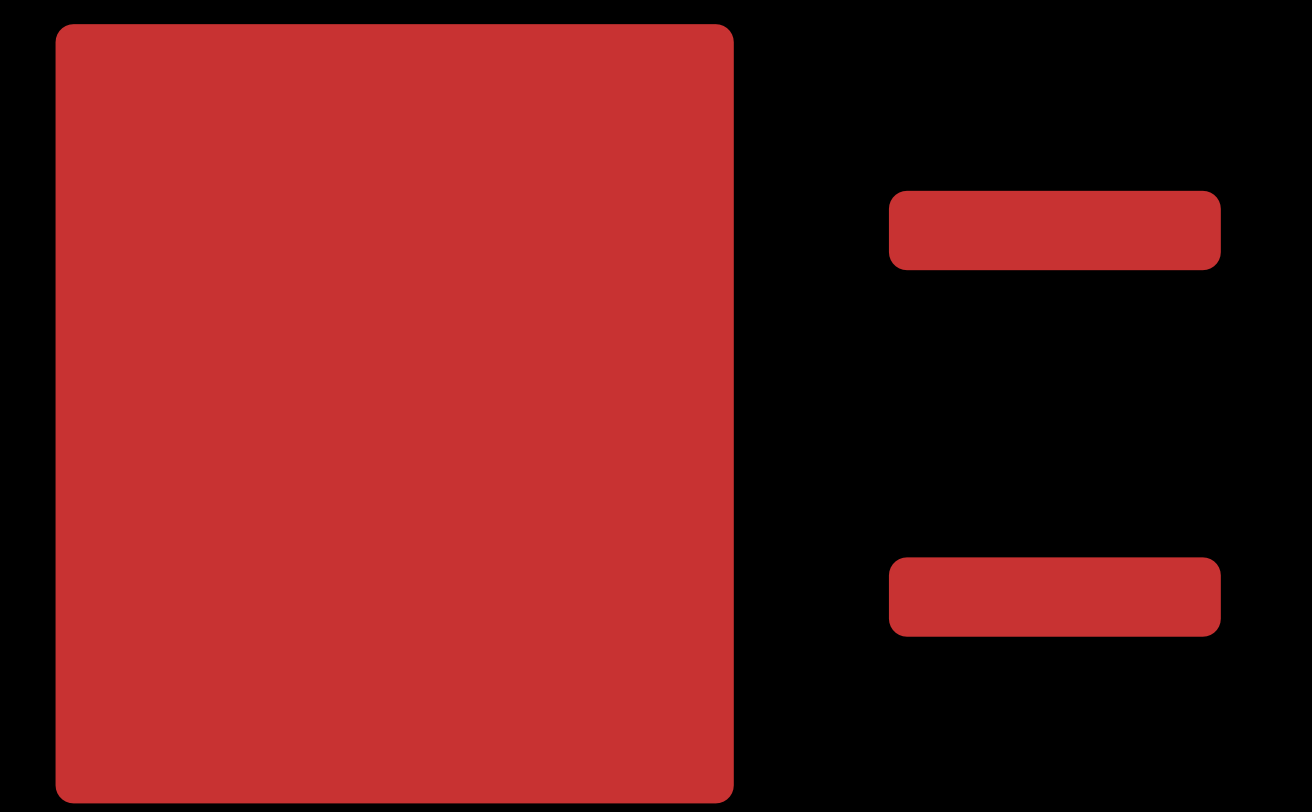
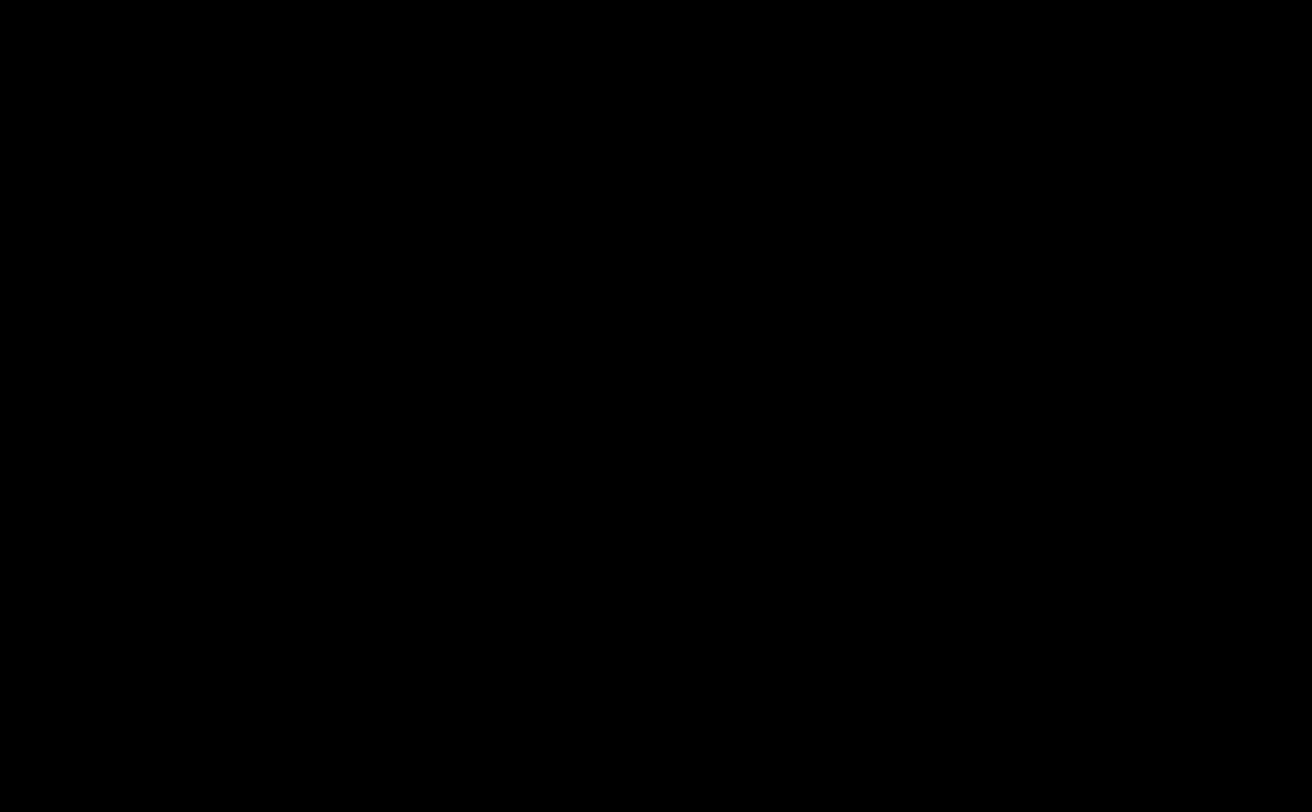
part: (638, 413) -> none

